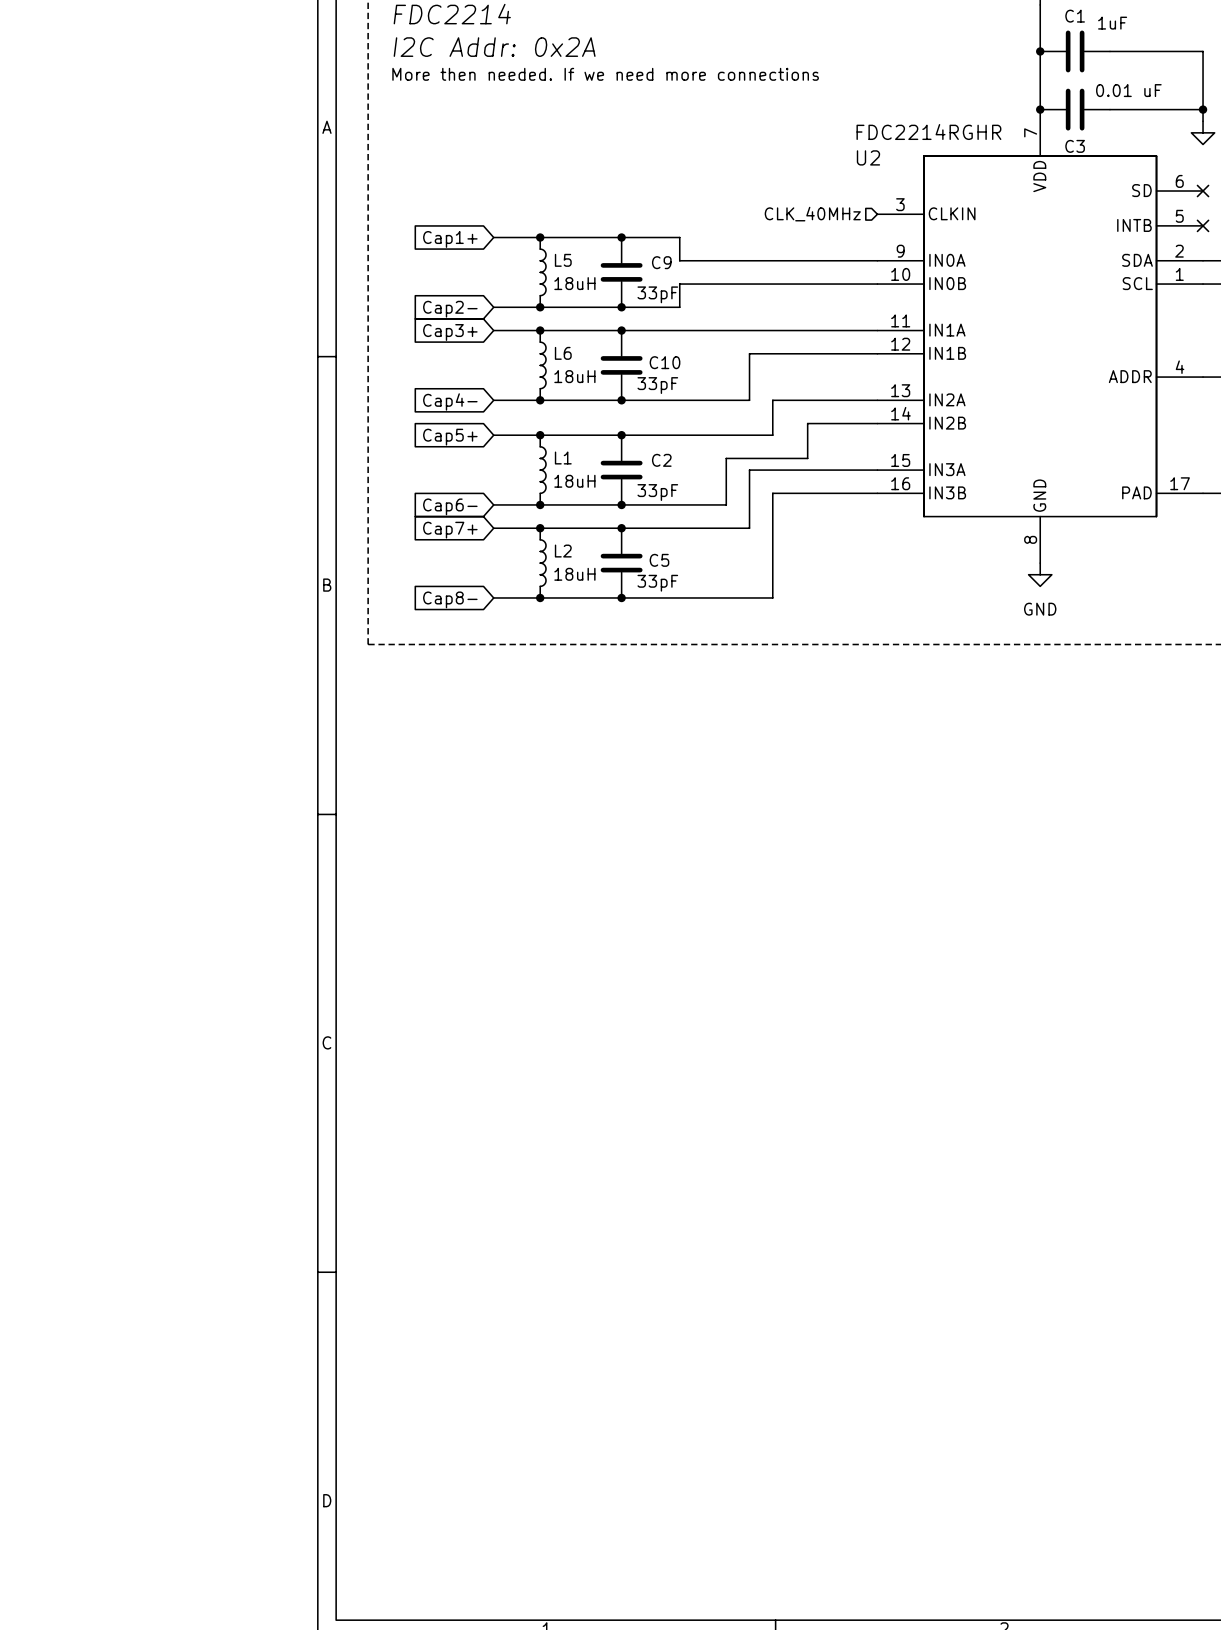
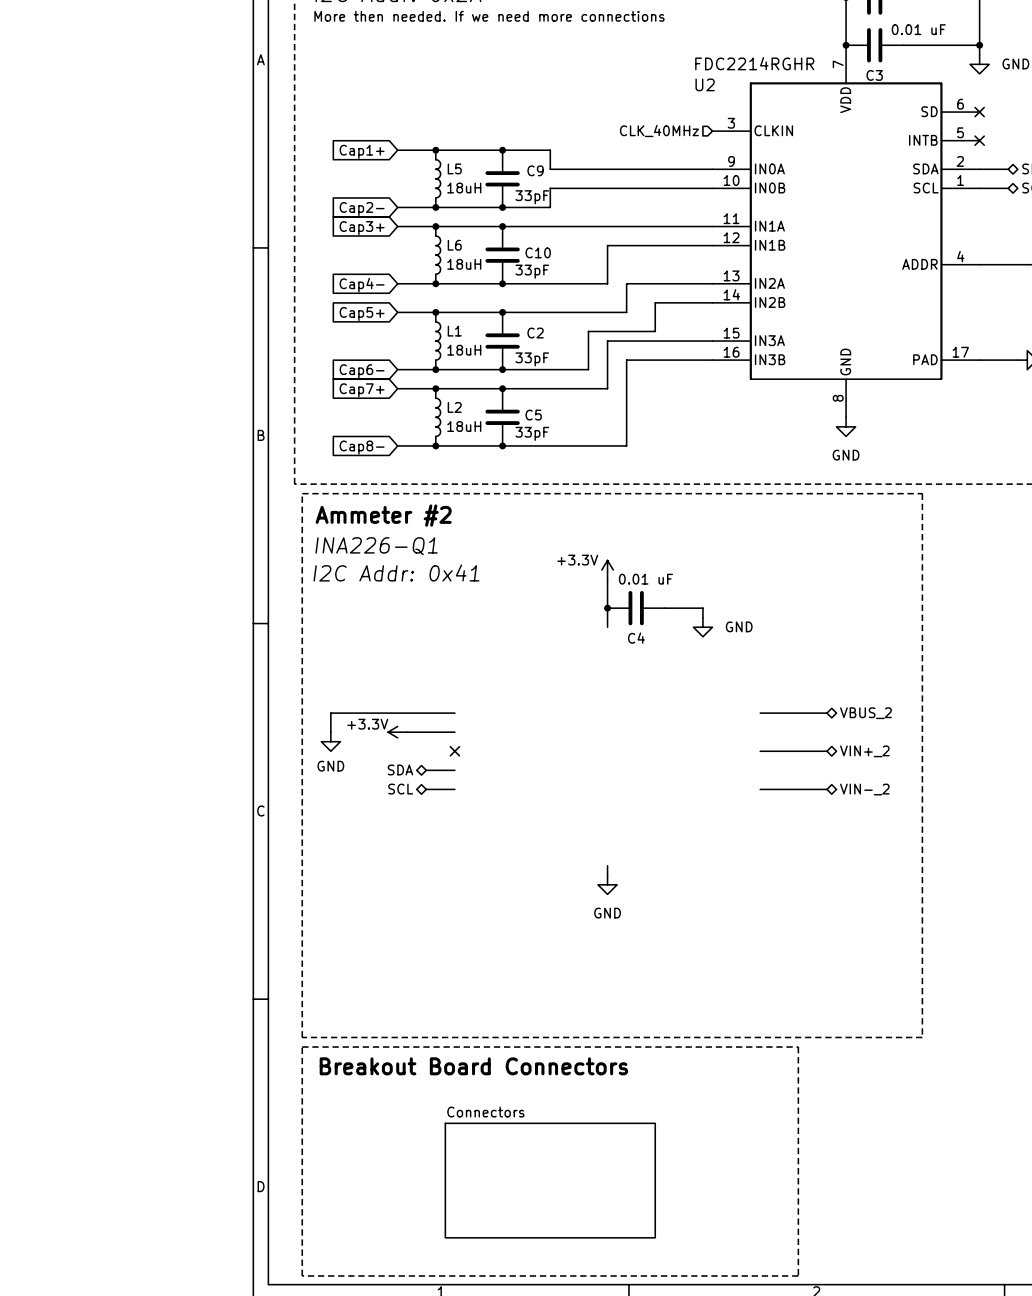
line: none -> (302, 493) (922, 493) (922, 1037) (302, 1037) (302, 493)
text: none -> Ammeter #2 (383, 515)
text: none -> INA226-Q1 (376, 546)
power symbol: none -> +3.3V (607, 569)
text: none -> I2C Addr: 0x41 (396, 572)
wire: none -> (607, 579) (607, 627)
junction: none -> (607, 608)
C4: none -> 0.01 uF (636, 608)
wire: none -> (664, 608) (702, 608) (702, 617)
power symbol: none -> GND (702, 627)
wire: none -> (454, 713) (330, 713) (330, 732)
wire: none -> (760, 713) (826, 713)
hierarchical label: none -> VBUS_2 (865, 713)
power symbol: none -> +3.3V (397, 732)
wire: none -> (407, 732) (454, 732)
power symbol: none -> GND (330, 741)
no-connect mark: none -> (454, 751)
wire: none -> (760, 751) (826, 751)
hierarchical label: none -> VIN+_2 (864, 751)
hierarchical label: none -> SDA (400, 769)
wire: none -> (426, 770) (454, 770)
hierarchical label: none -> SCL (400, 789)
wire: none -> (426, 789) (454, 789)
wire: none -> (760, 789) (826, 789)
hierarchical label: none -> VIN-_2 (864, 789)
wire: none -> (607, 865) (607, 875)
power symbol: none -> GND (607, 884)
line: none -> (302, 1047) (302, 1275) (798, 1275) (798, 1047) (302, 1047)
text: none -> Breakout Board Connectors (473, 1066)
sheet Connectors: none -> (550, 1180)

